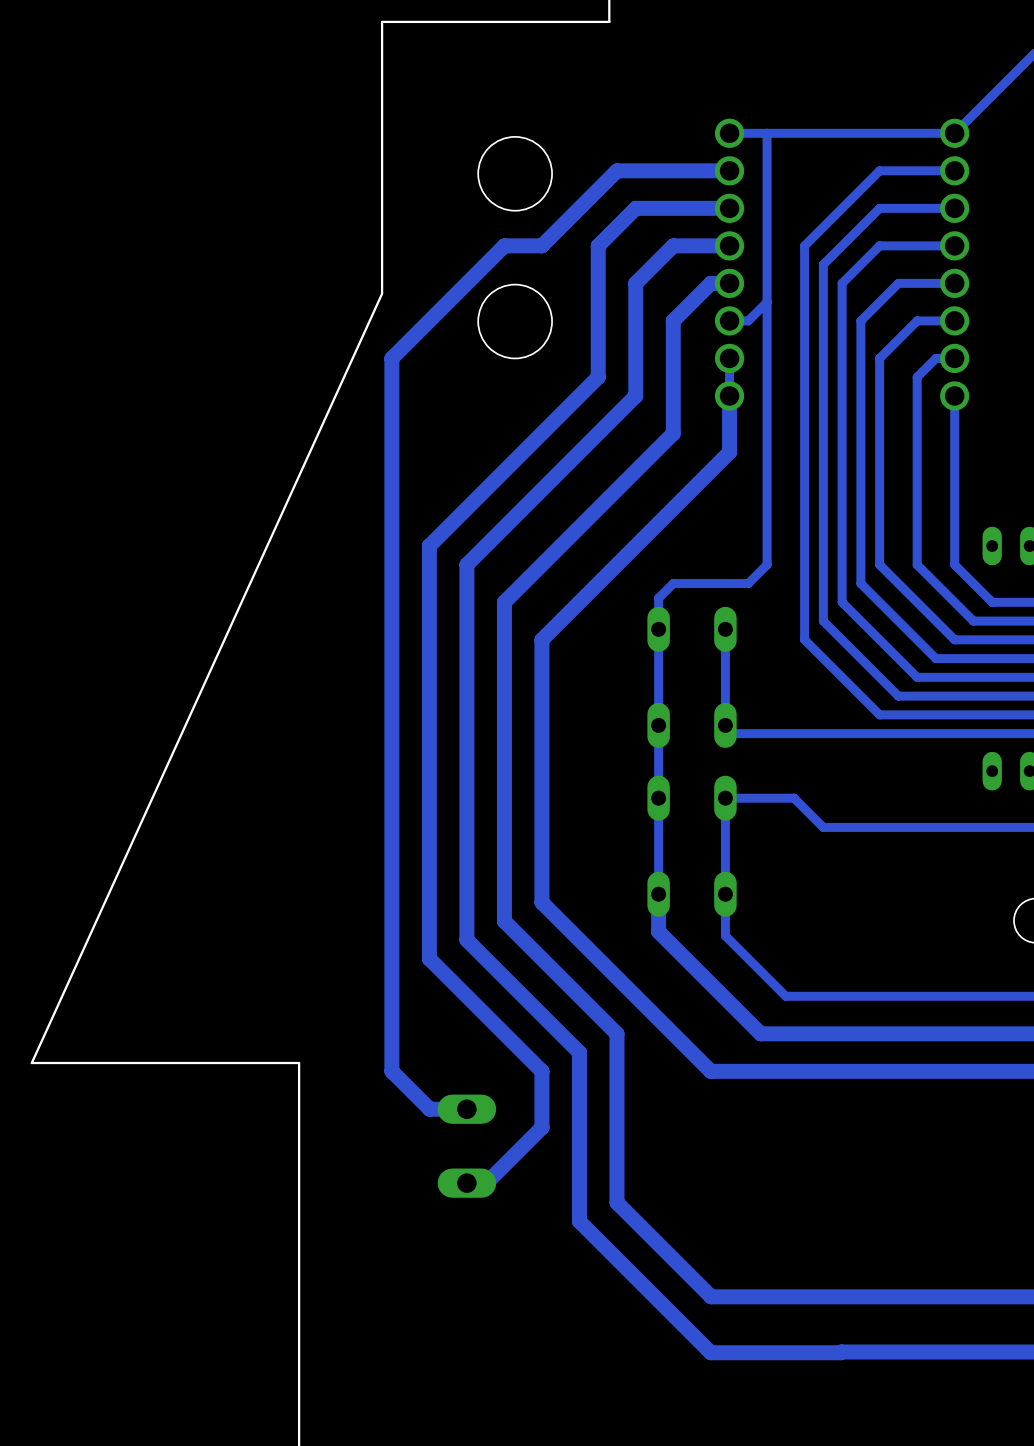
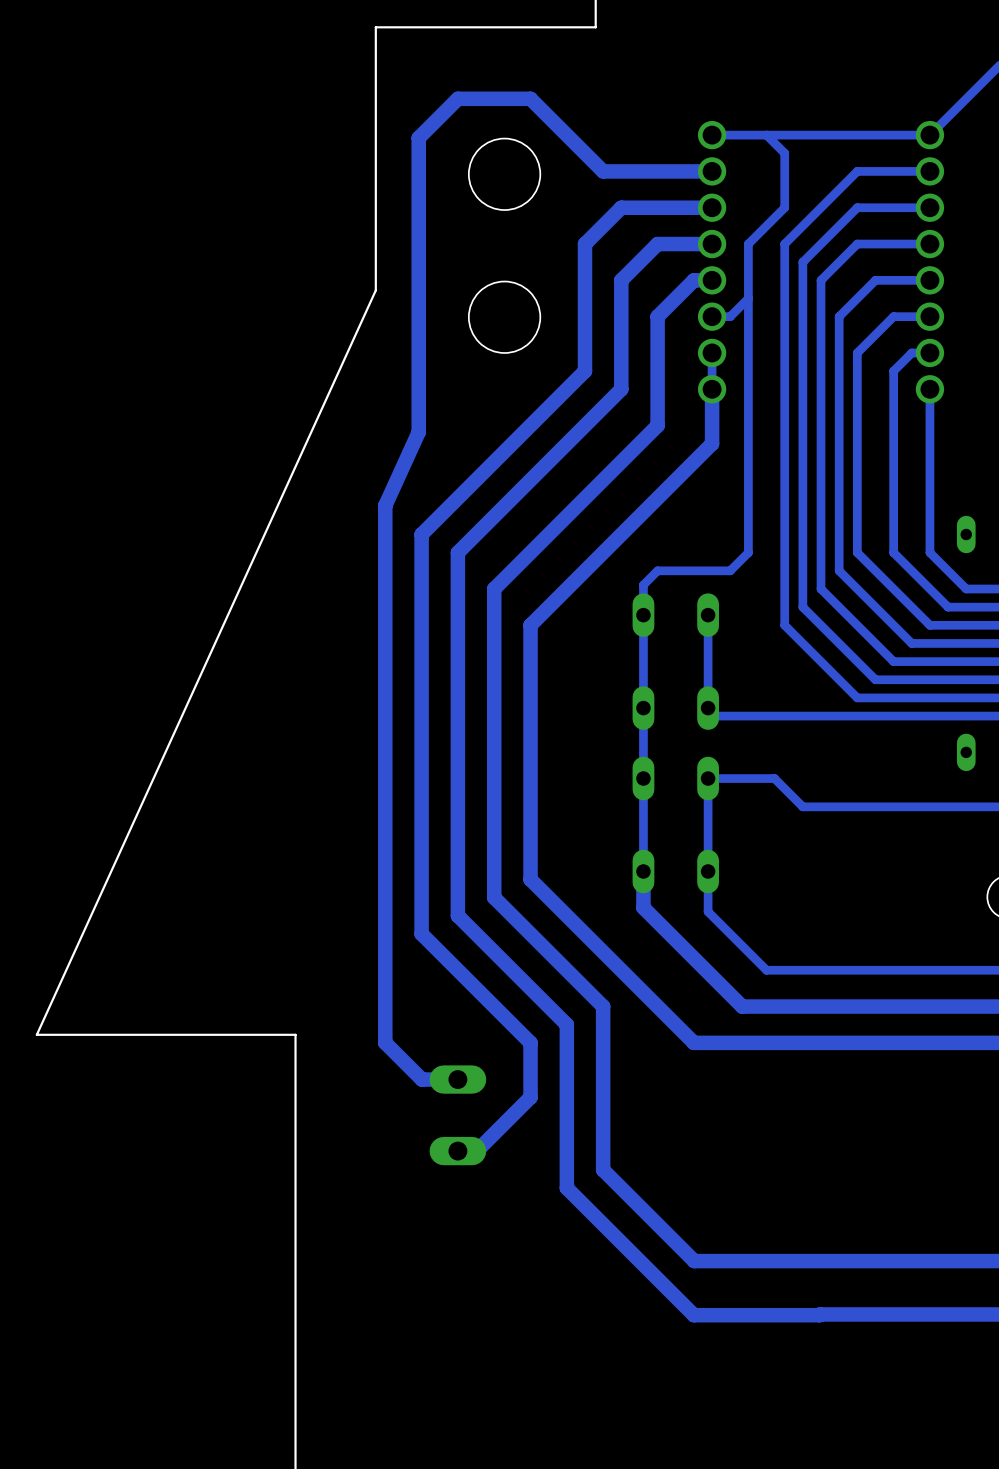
bottom track: (767, 133) (767, 245) -> (766, 135) (784, 153) (784, 207) (748, 244)
bottom track: (616, 170) (541, 245) (504, 245) (391, 358) (391, 516) -> (603, 171) (530, 98) (457, 98) (418, 137) (418, 432) (385, 505)

